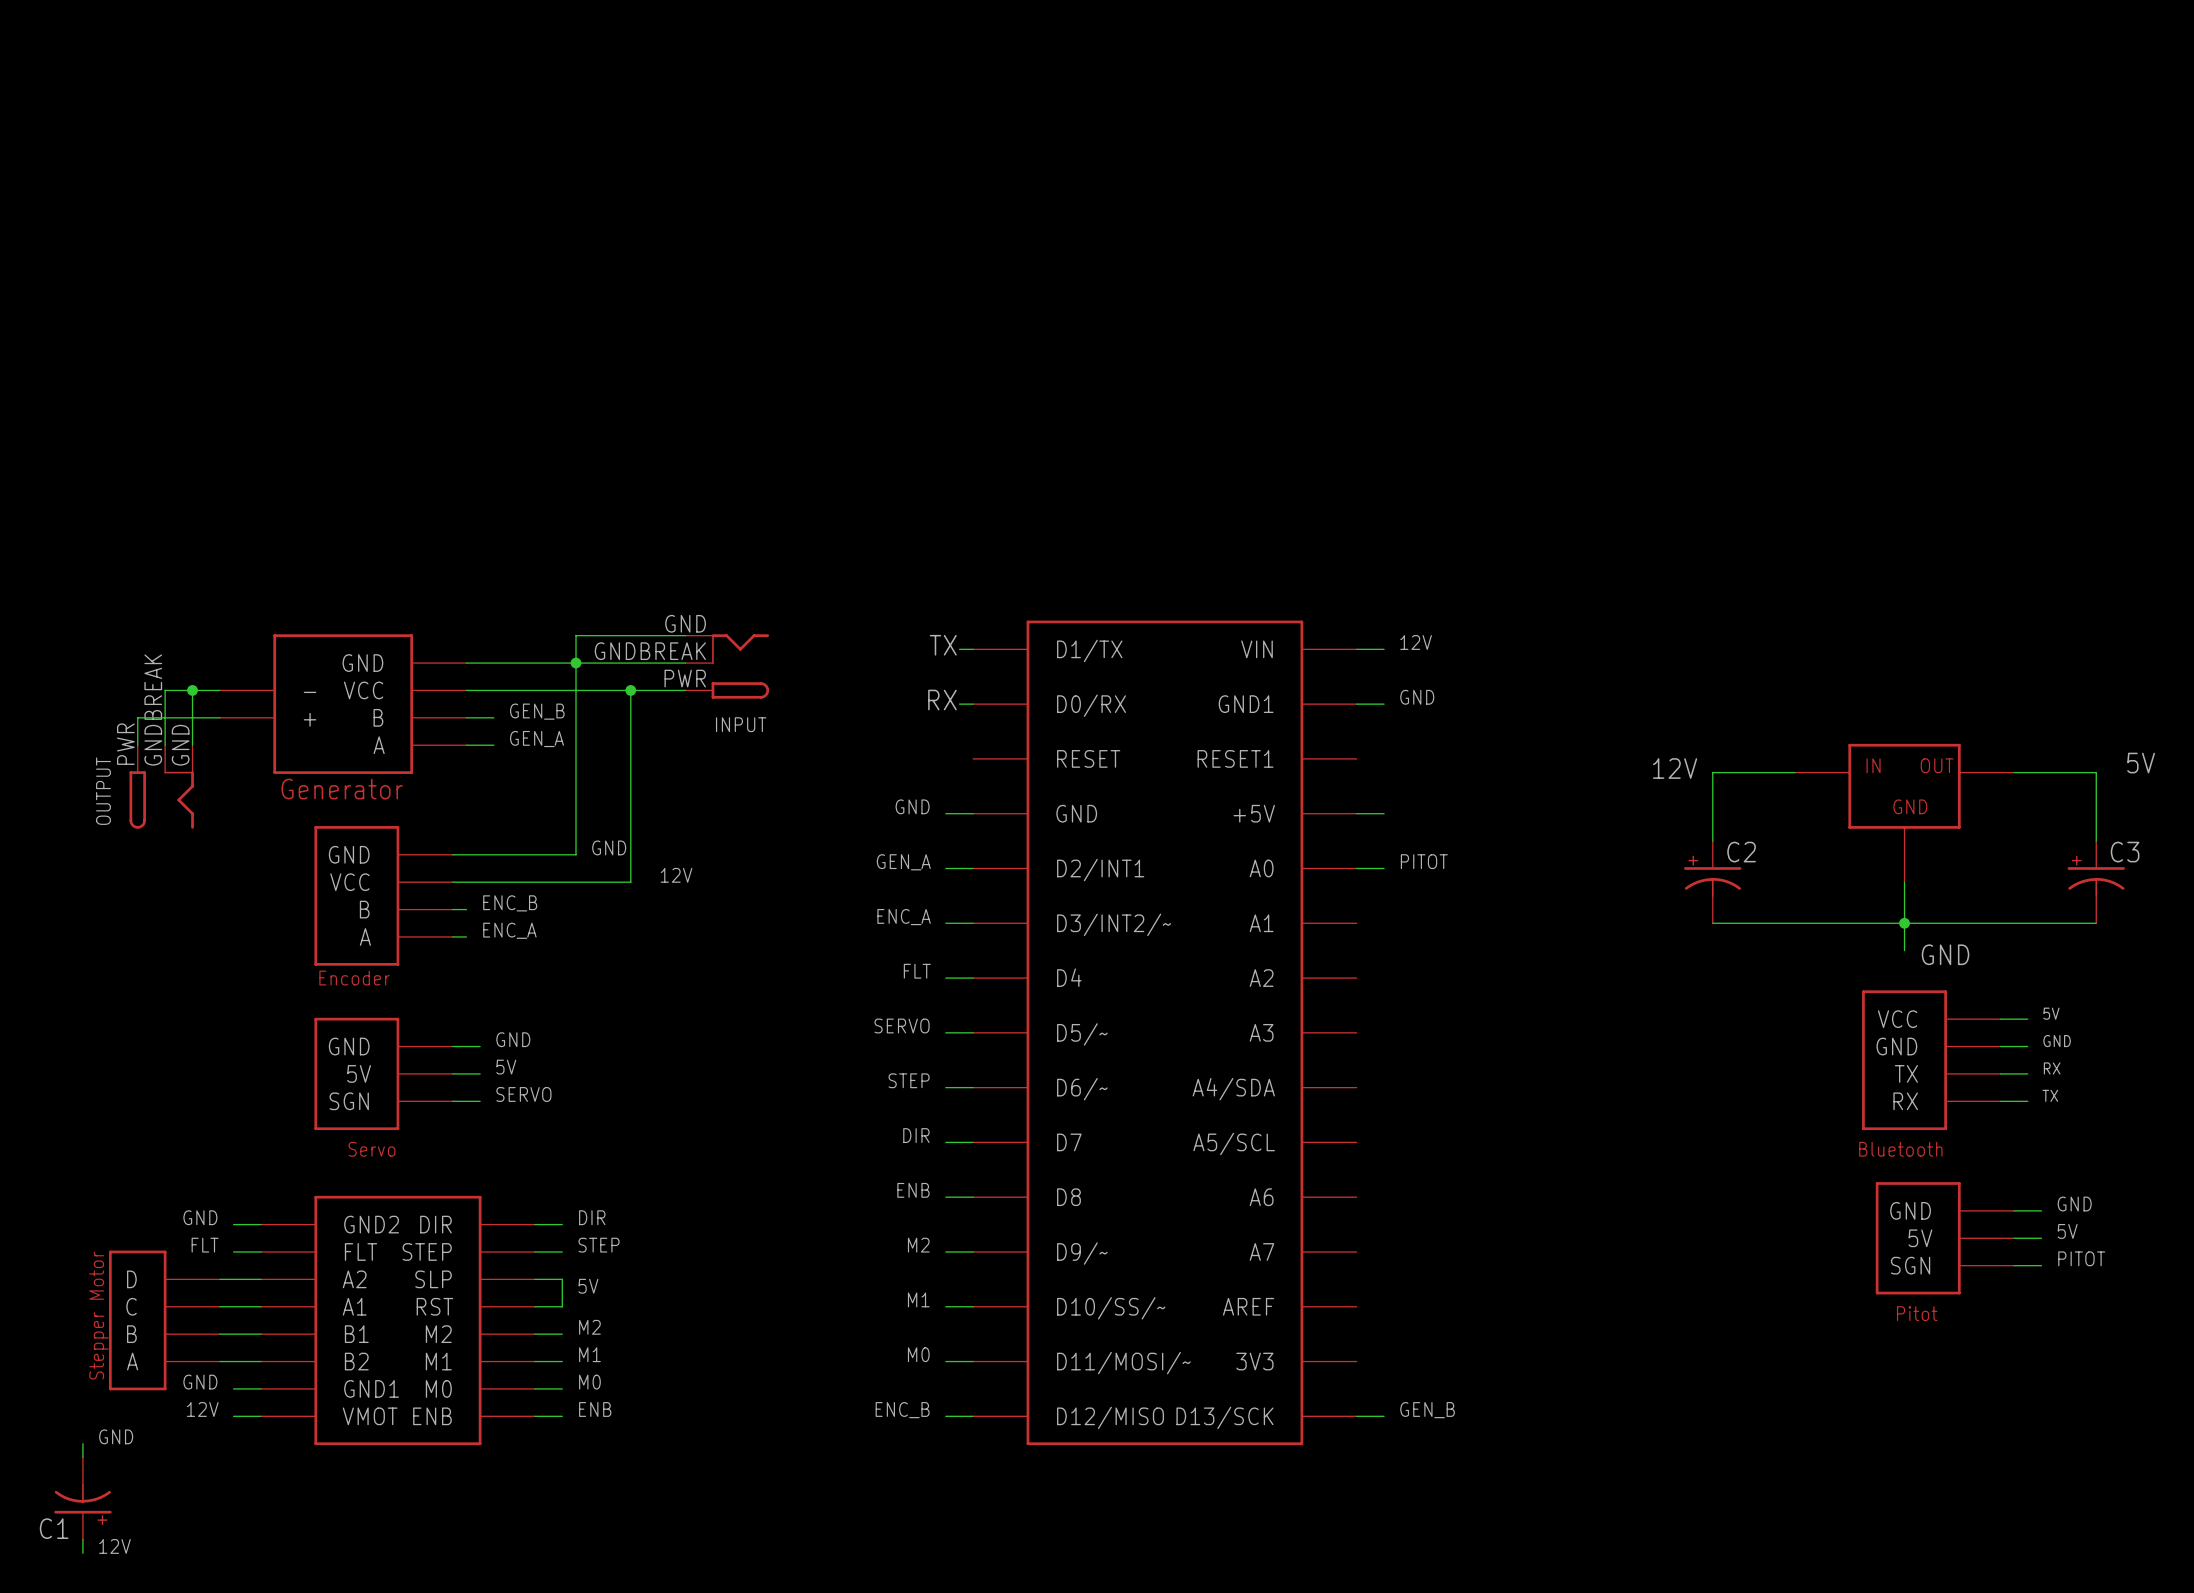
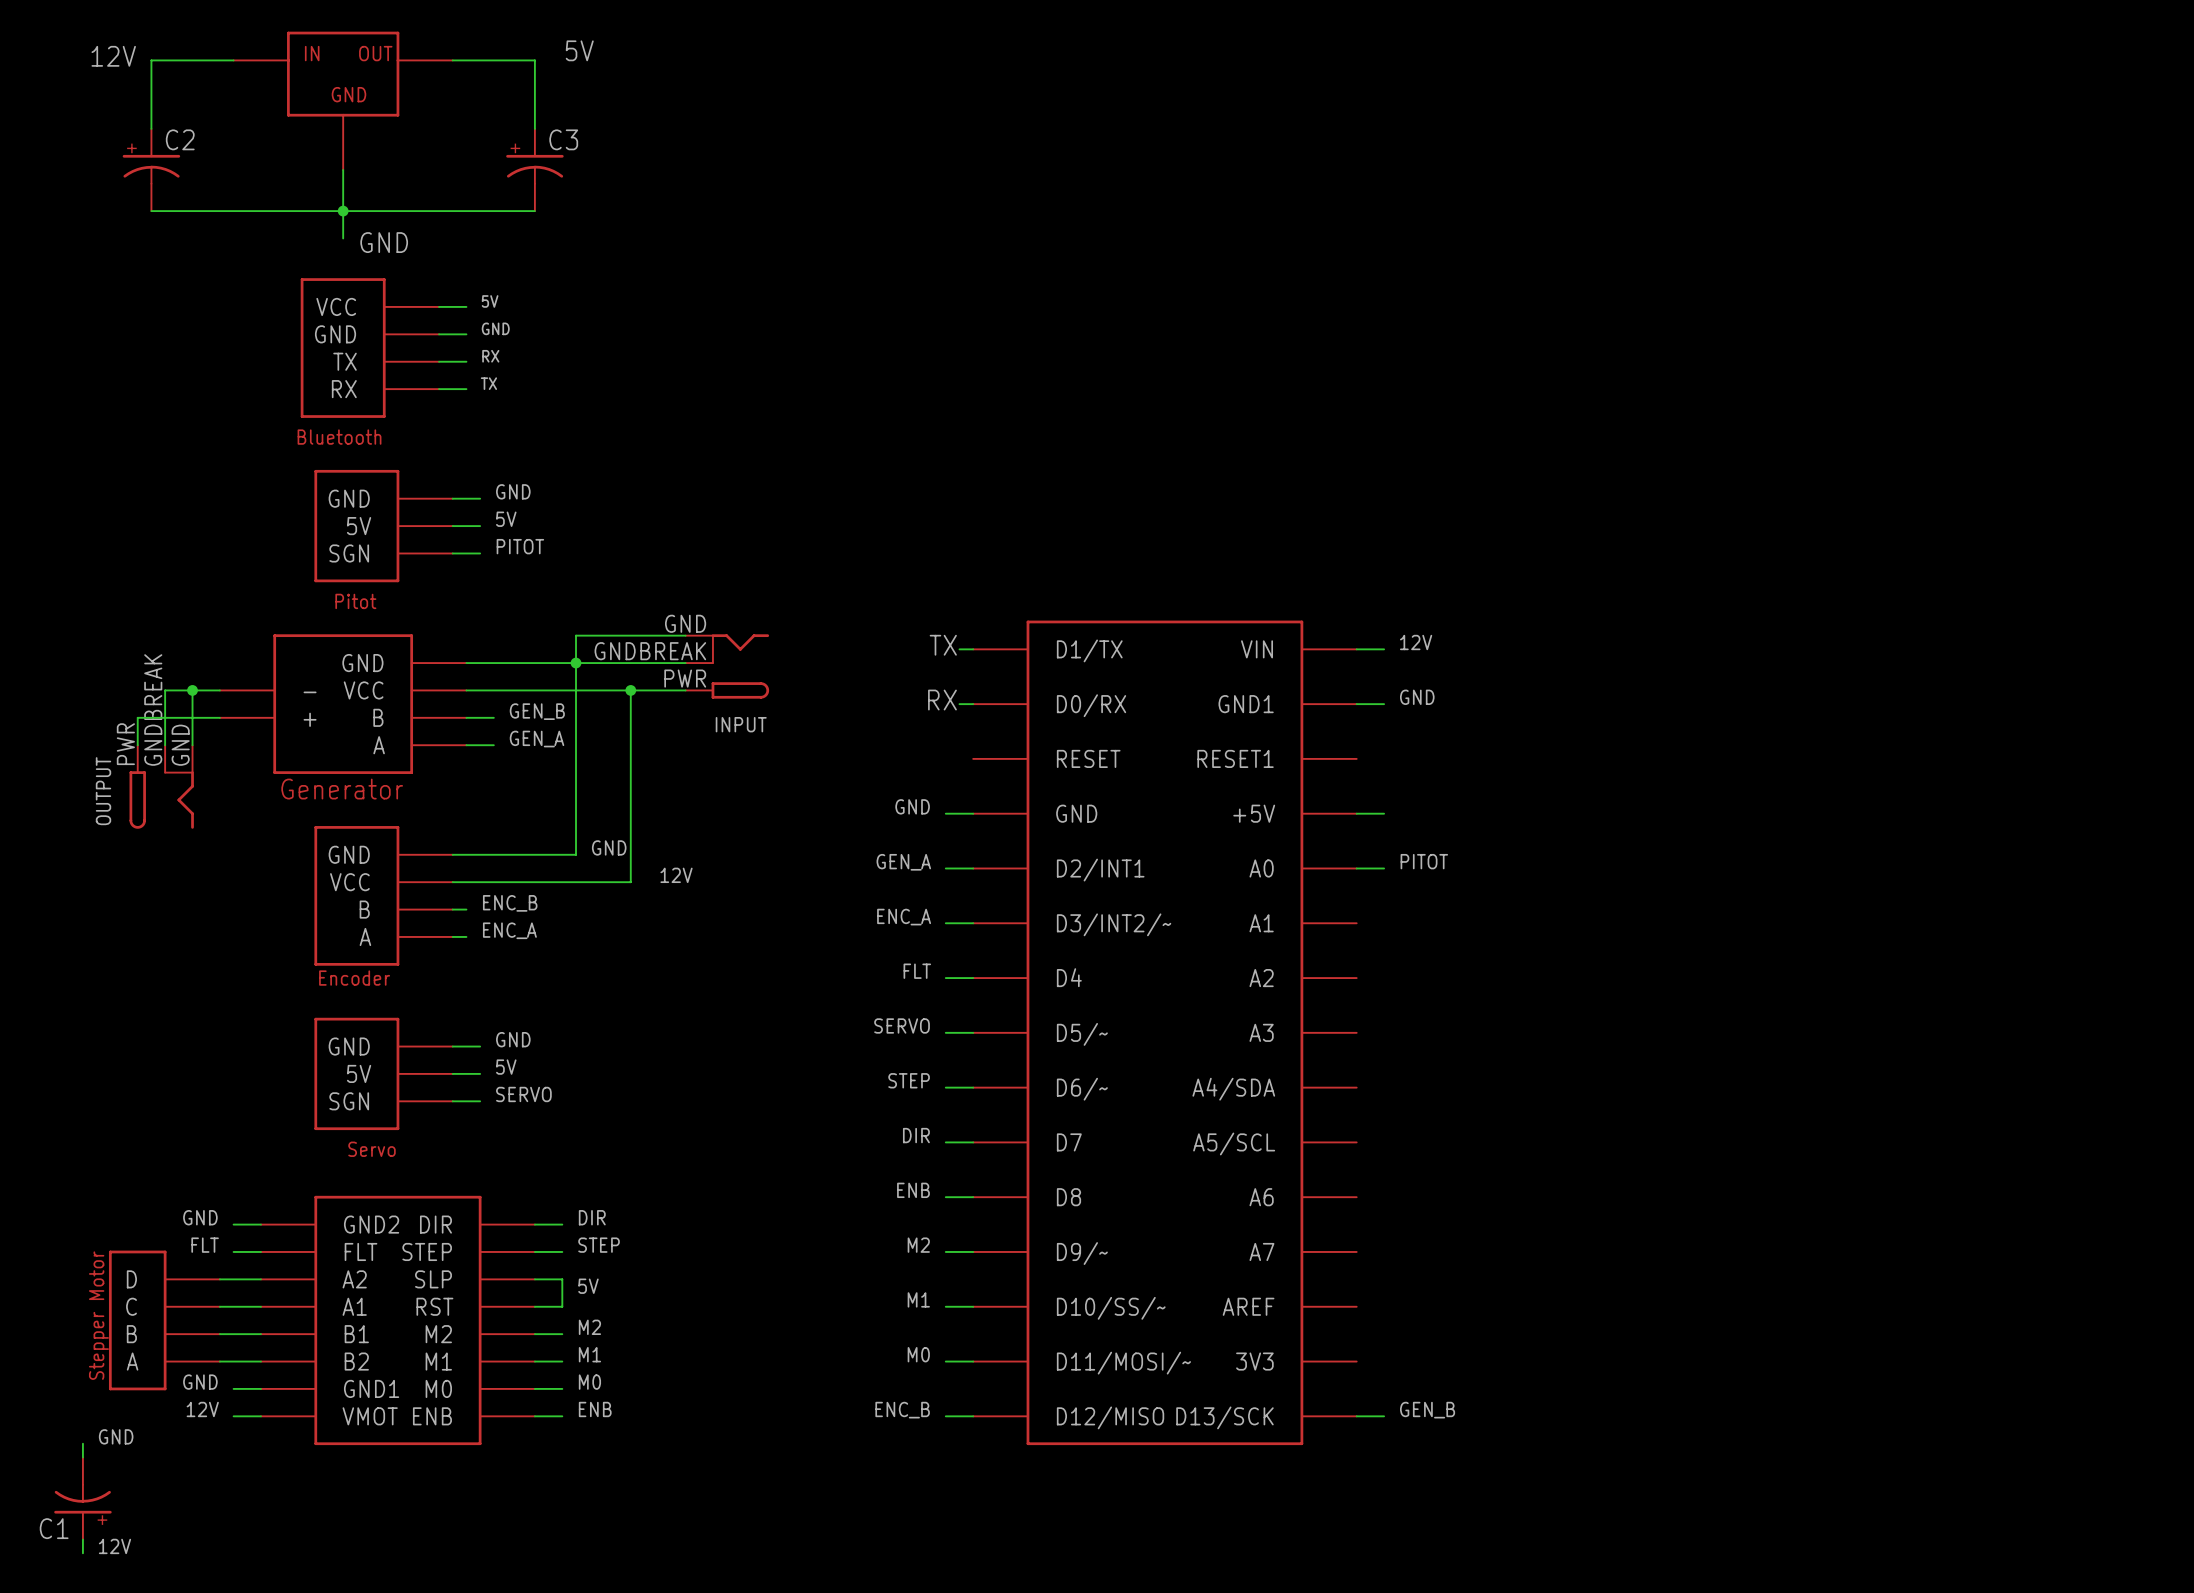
label: none -> 5V (579, 50)
label: none -> 12V (113, 56)
wire: none -> (233, 60) (151, 60) (151, 128)
wire: none -> (452, 60) (534, 60) (534, 128)
part: none -> (343, 100)
wire: none -> (343, 169) (343, 238)
wire: none -> (151, 211) (534, 211)
junction: none -> (343, 211)
label: none -> GND (384, 242)
label: none -> 5V (490, 301)
wire: none -> (439, 306) (466, 306)
label: none -> GND (495, 328)
wire: none -> (439, 334) (466, 334)
part: none -> (369, 348)
label: none -> RX (490, 356)
wire: none -> (439, 361) (466, 361)
label: none -> TX (488, 383)
wire: none -> (439, 389) (466, 389)
label: none -> GND (513, 491)
wire: none -> (452, 498) (480, 498)
label: none -> 5V (506, 519)
part: none -> (383, 526)
wire: none -> (452, 526) (480, 526)
label: none -> PITOT (520, 546)
wire: none -> (452, 553) (480, 553)
label: 5V (2141, 763) -> none
label: 12V (1675, 768) -> none
wire: (1794, 772) (1712, 772) (1712, 841) -> none
wire: (2014, 772) (2096, 772) (2096, 841) -> none
part: (1904, 813) -> none
C2 position: (1712, 882) -> (151, 169)
wire: (1904, 882) (1904, 950) -> none
C3 position: (2096, 882) -> (534, 169)
wire: (1712, 923) (2096, 923) -> none
junction: (1904, 923) -> none
label: GND (1945, 954) -> none
label: 5V (2051, 1013) -> none
wire: (2000, 1019) (2027, 1019) -> none
label: GND (2057, 1041) -> none
wire: (2000, 1046) (2027, 1046) -> none
part: (1931, 1060) -> none
label: RX (2052, 1068) -> none
wire: (2000, 1073) (2027, 1073) -> none
label: TX (2050, 1095) -> none
wire: (2000, 1101) (2027, 1101) -> none
label: GND (2074, 1204) -> none
wire: (2014, 1210) (2041, 1210) -> none
label: 5V (2067, 1231) -> none
part: (1944, 1238) -> none
wire: (2014, 1238) (2041, 1238) -> none
label: PITOT (2081, 1258) -> none
wire: (2014, 1265) (2041, 1265) -> none

